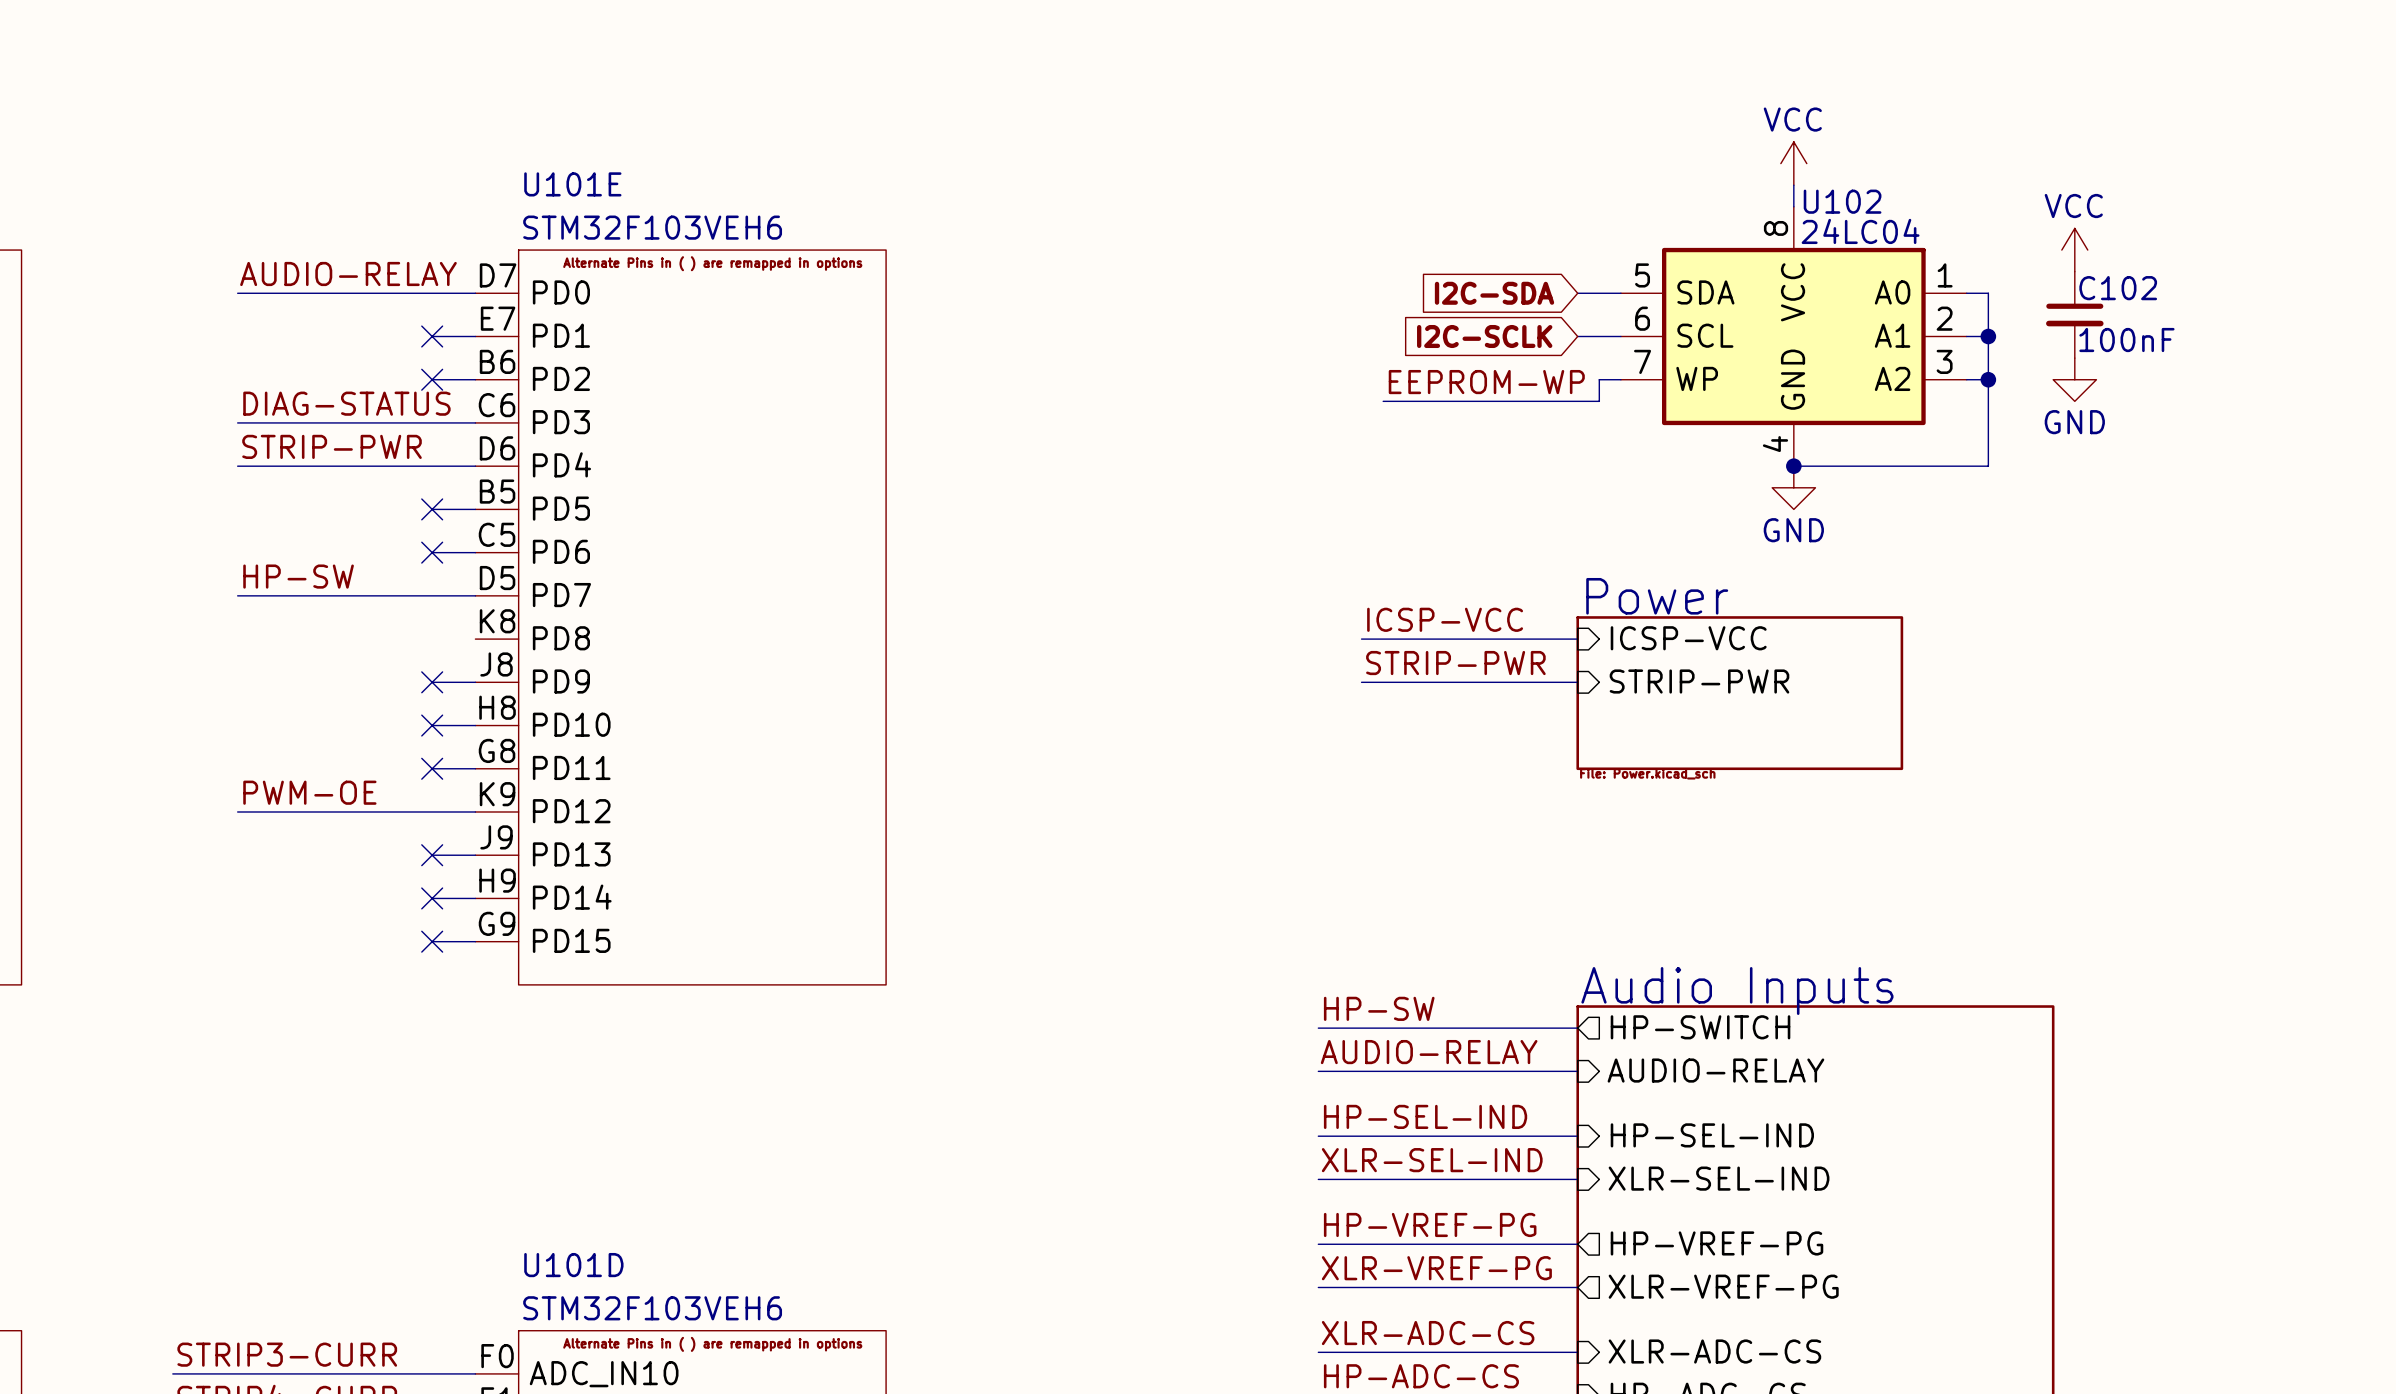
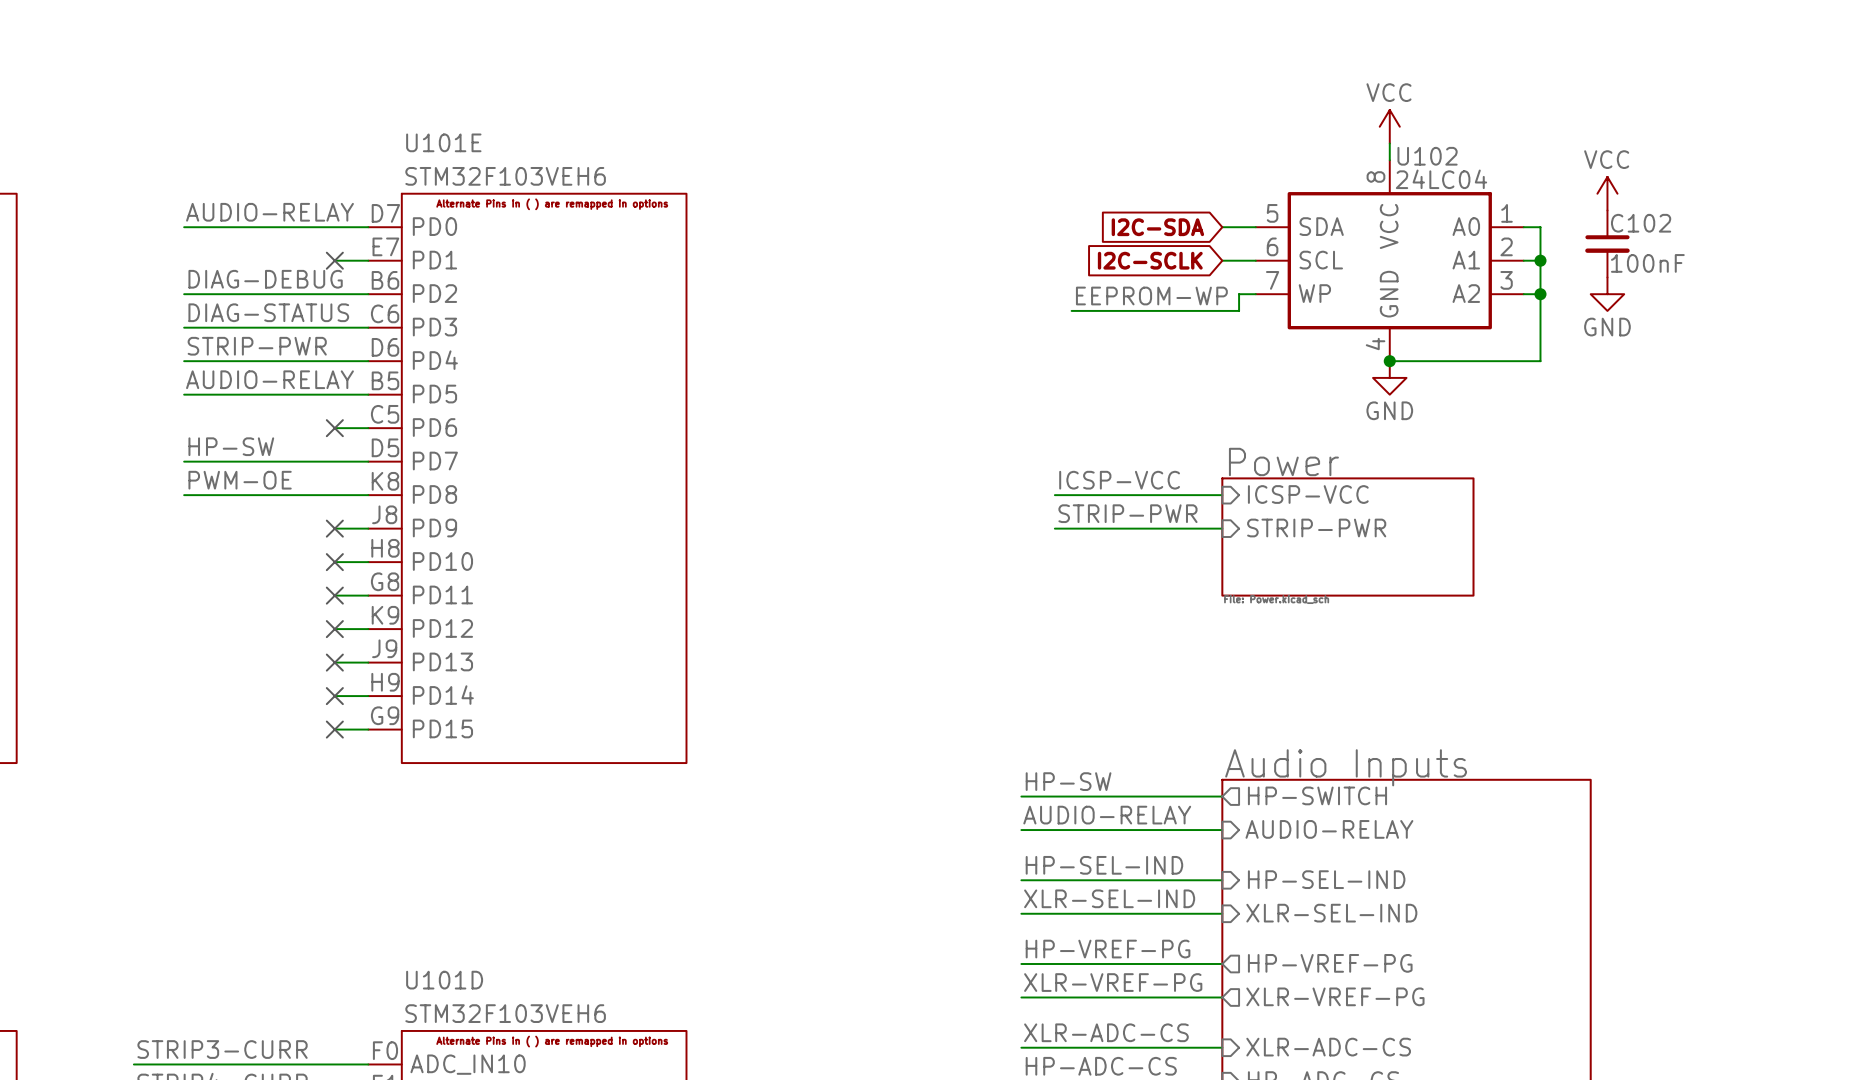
label: none -> DIAG-DEBUG (265, 279)
wire: none -> (184, 294) (334, 294)
no-connect mark: (432, 379) -> none
label: none -> AUDIO-RELAY (269, 379)
no-connect mark: (432, 509) -> none
wire: none -> (184, 495) (368, 495)
label position: PWM-OE (309, 792) -> PWM-OE (240, 480)
wire: (237, 811) (432, 811) -> (184, 394) (334, 394)
no-connect mark: none -> (334, 629)

